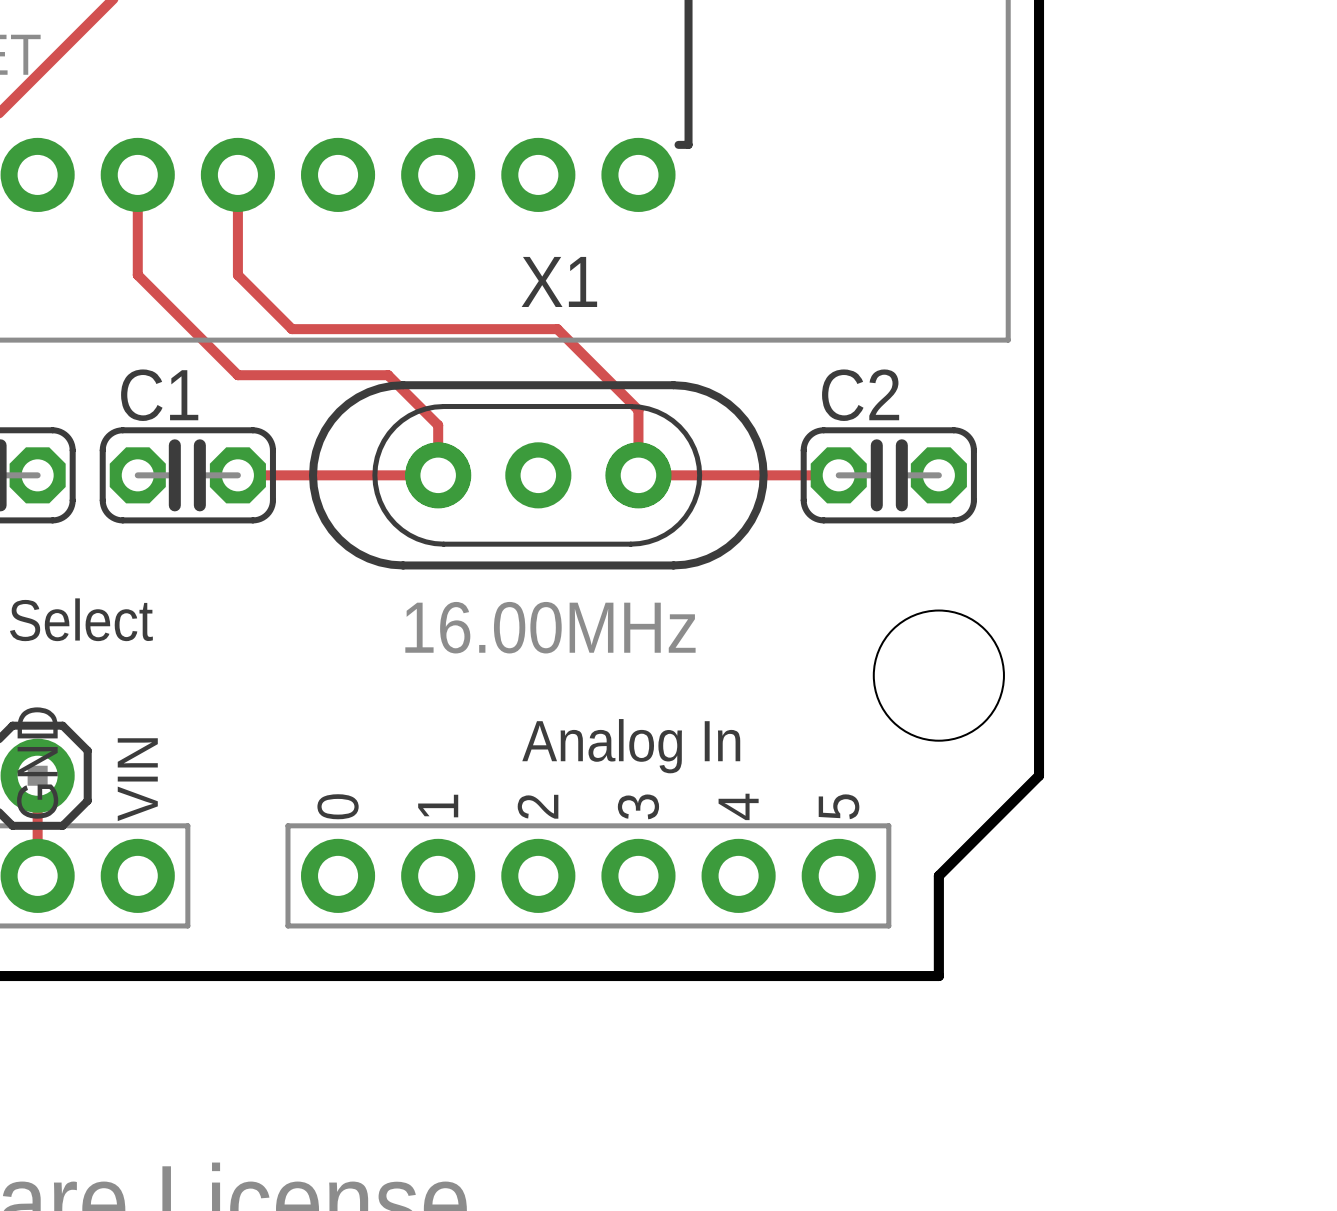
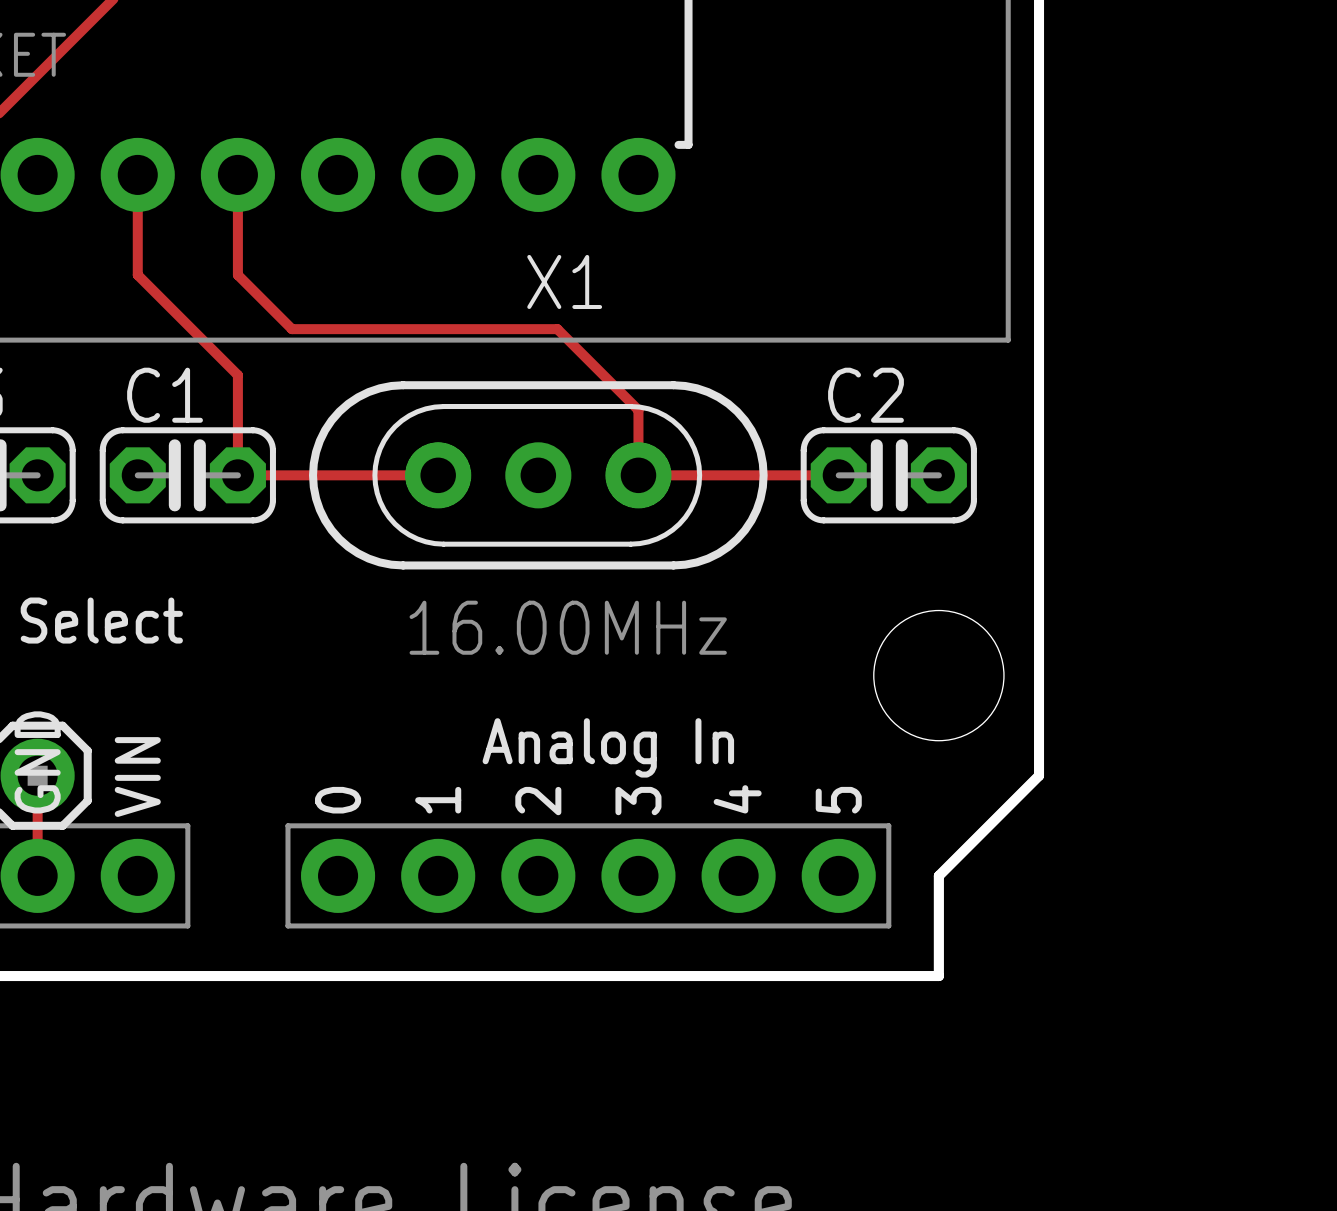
track: (237, 375) (388, 375) (438, 425) (438, 475) -> (237, 375) (237, 475)

